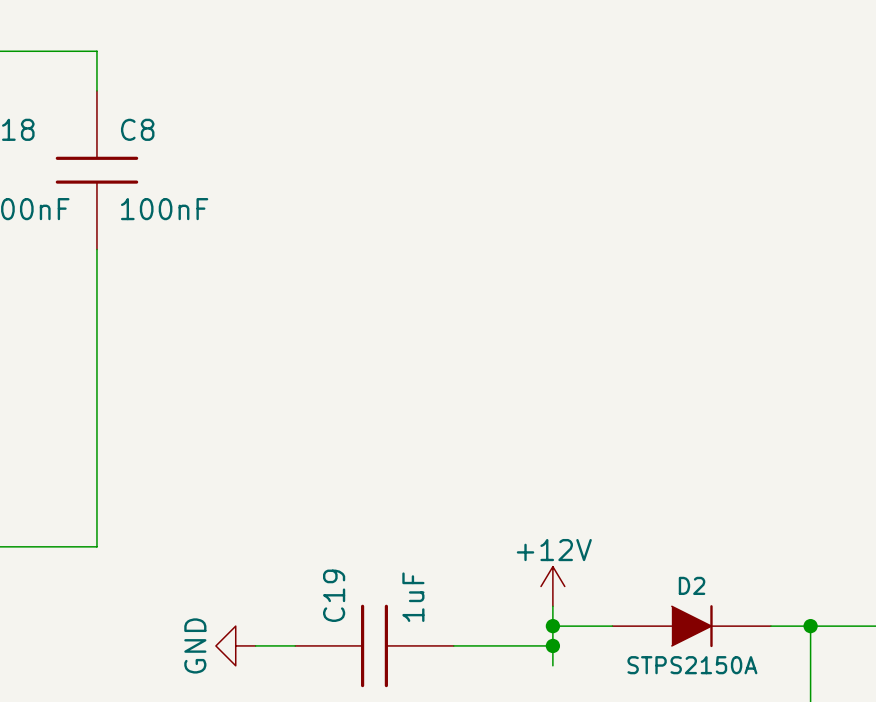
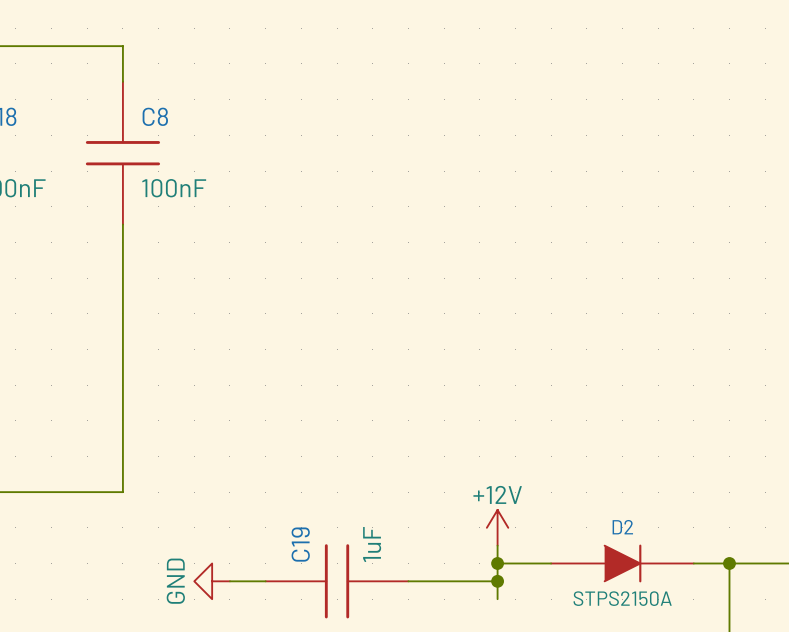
wire: (96, 51) (96, 90) -> (87, 46) (122, 46) (122, 81)
C8 position: (96, 170) -> (122, 153)
wire: (96, 249) (96, 546) -> (122, 224) (122, 492) (87, 492)

